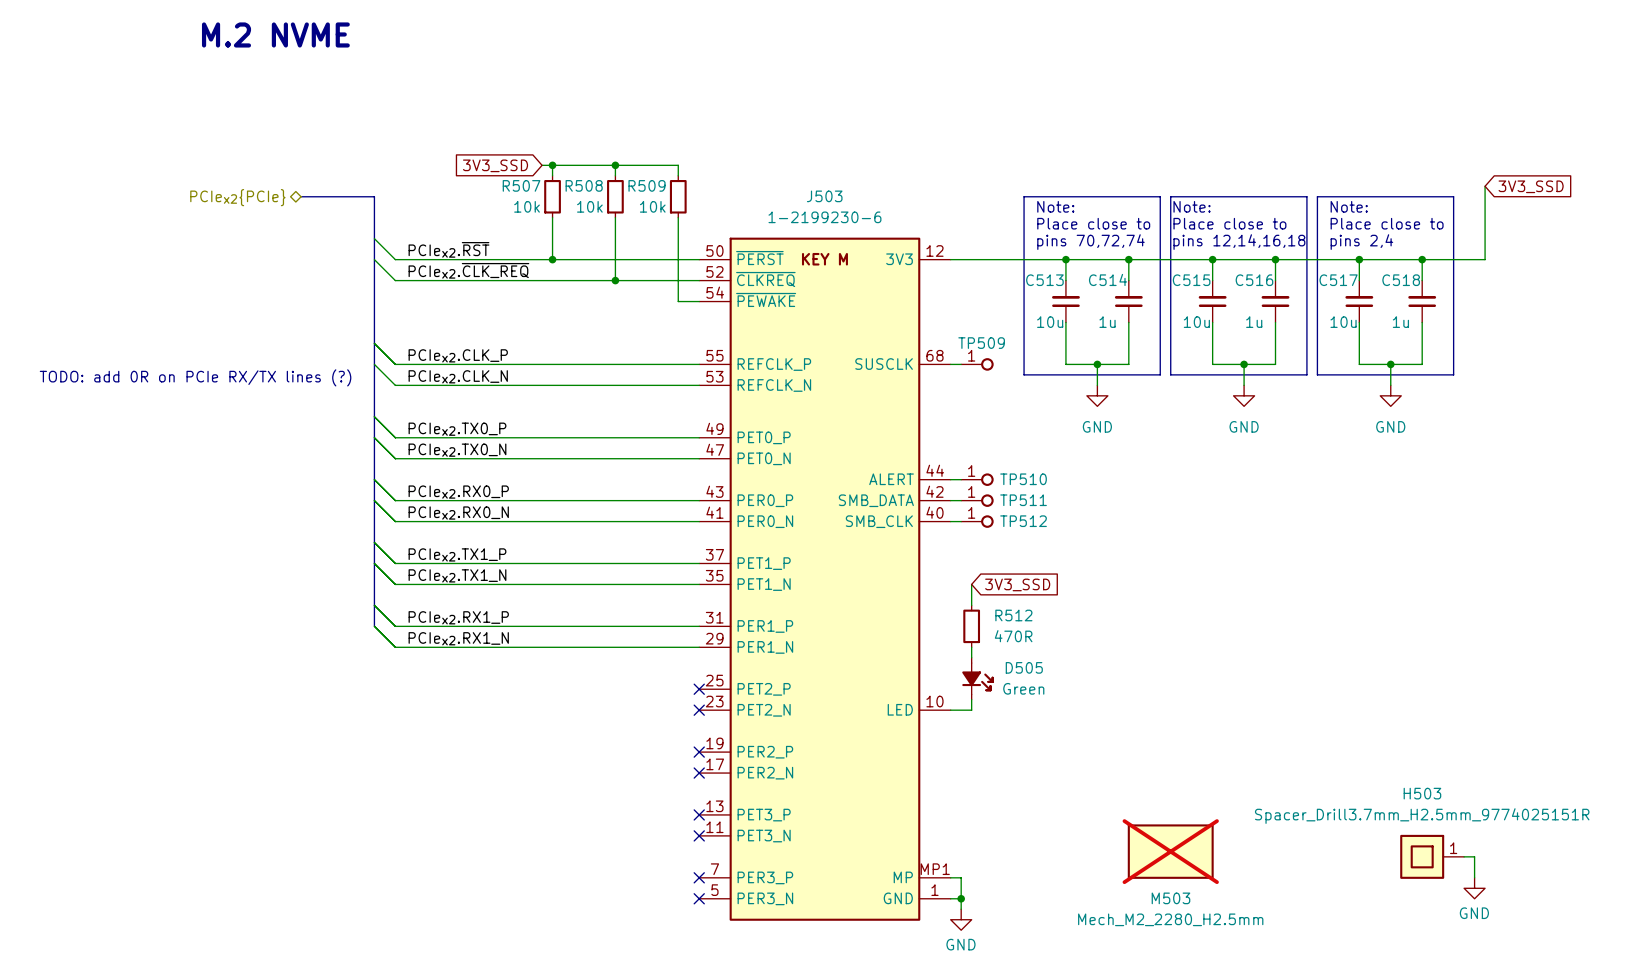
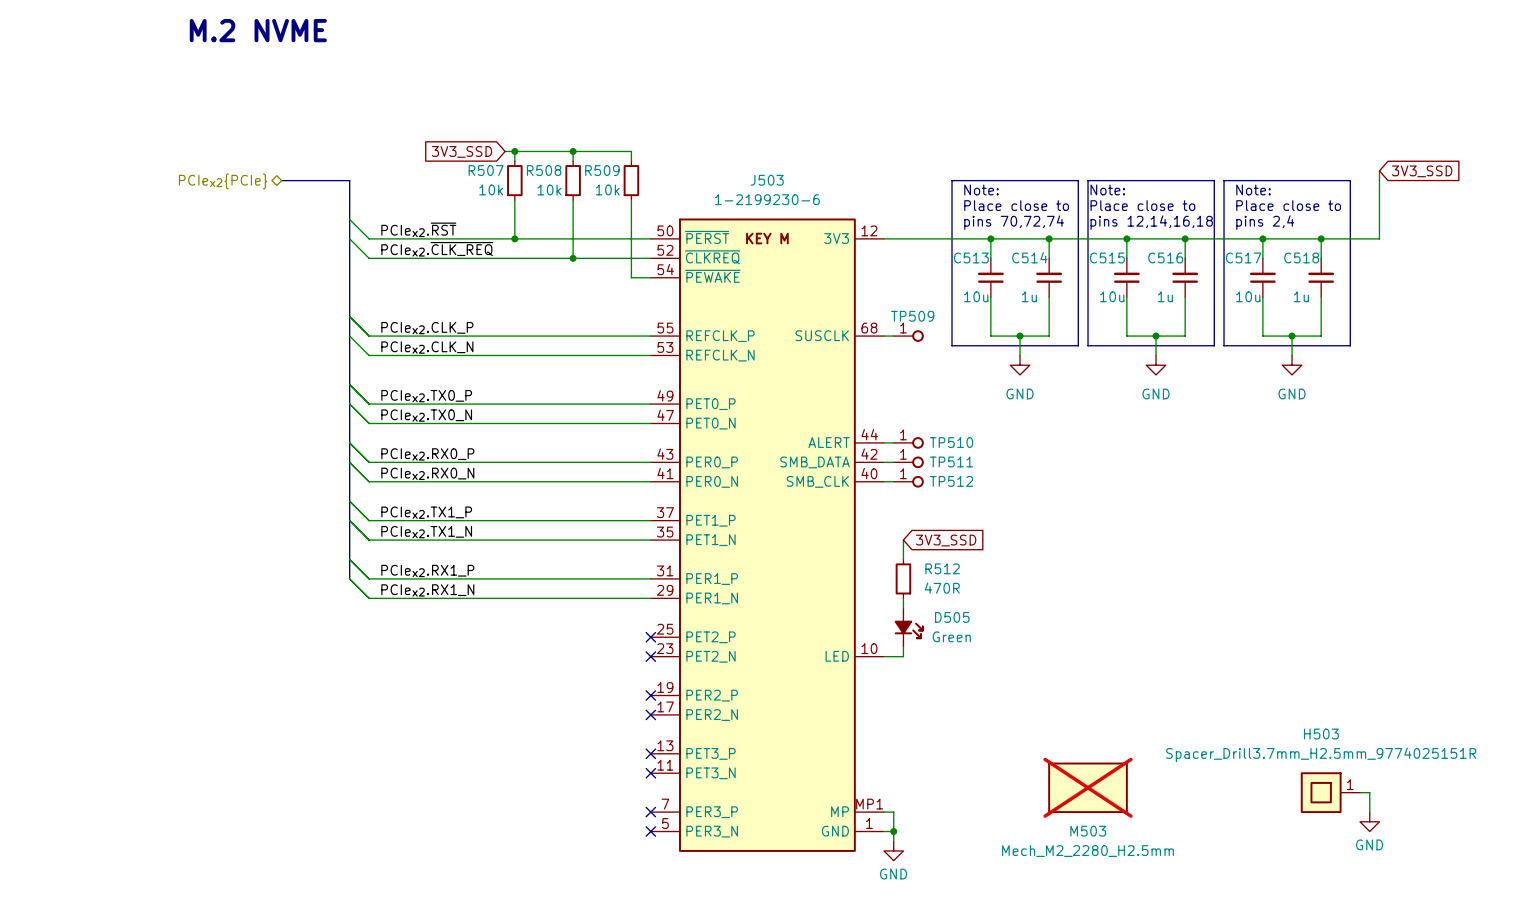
text: TODO: add 0R on PCIe RX/TX lines (?) (195, 377) -> none

